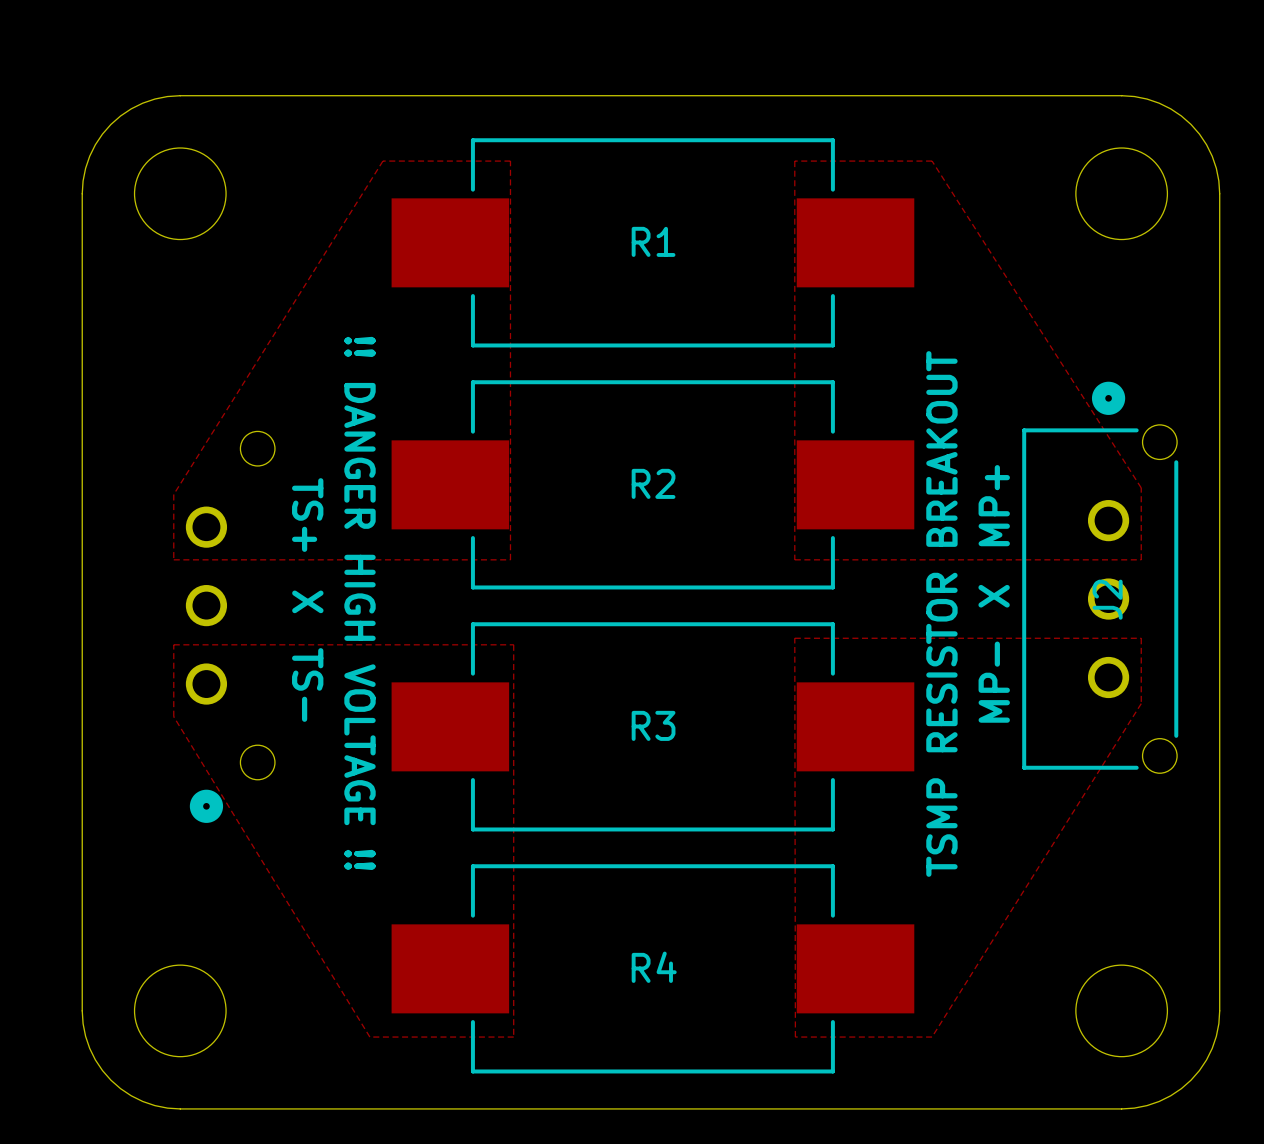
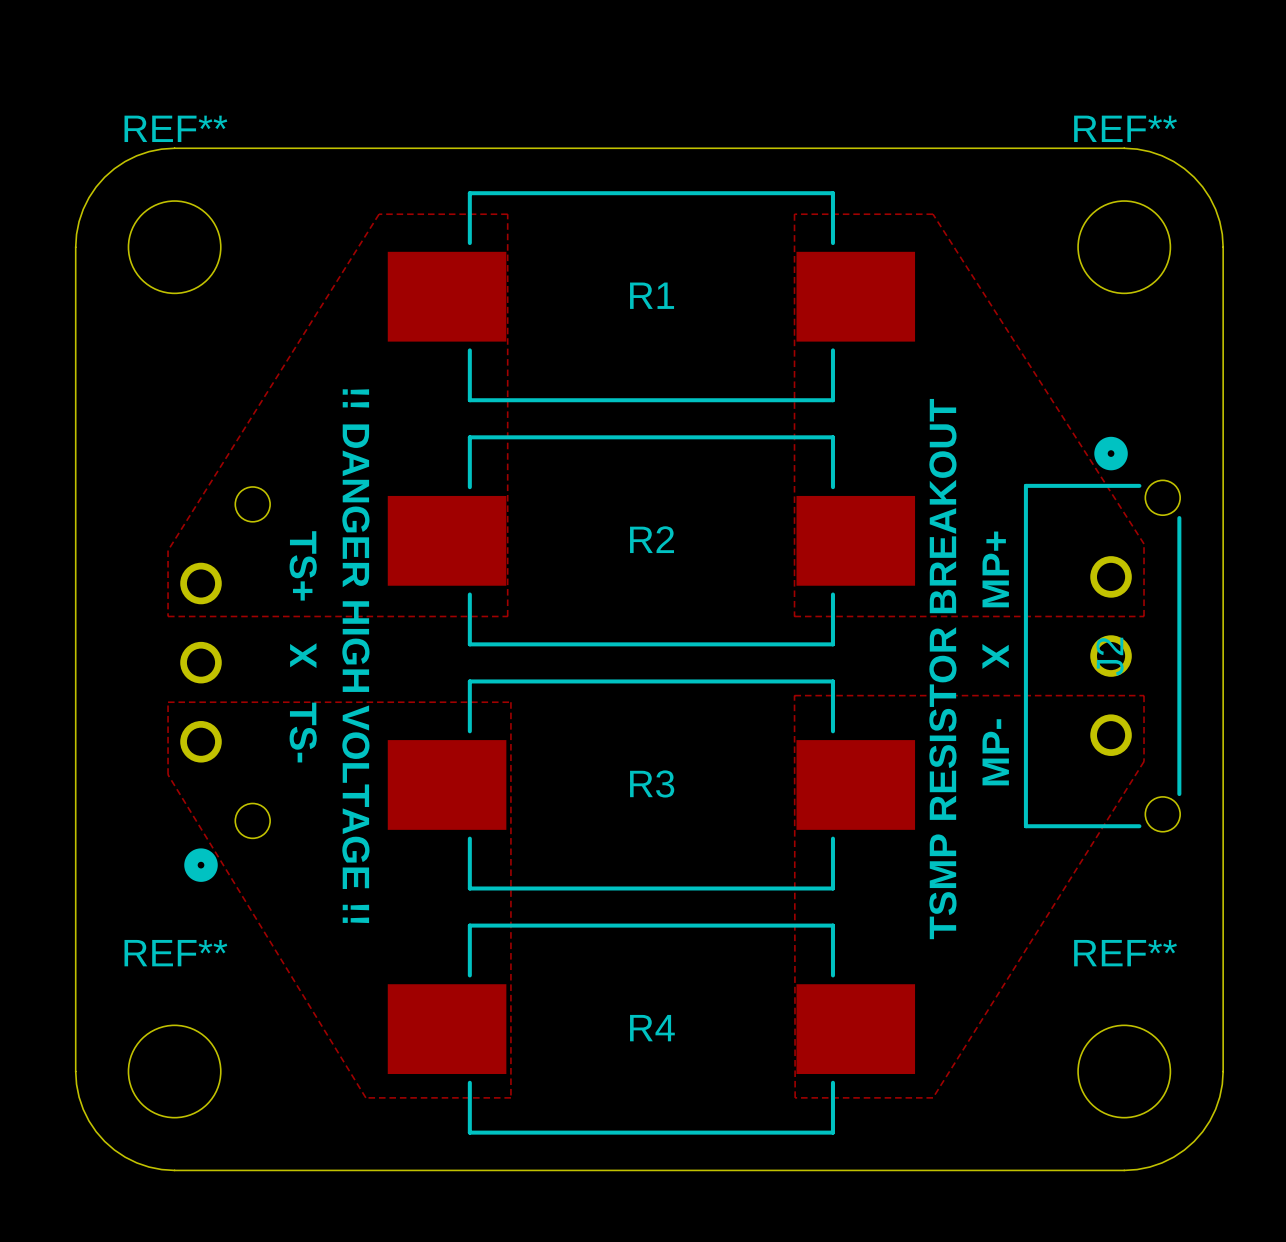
REF** name: none -> REF** (175, 128)
REF** name: none -> REF** (1125, 128)
REF** name: none -> REF** (175, 953)
REF** name: none -> REF** (1125, 953)

